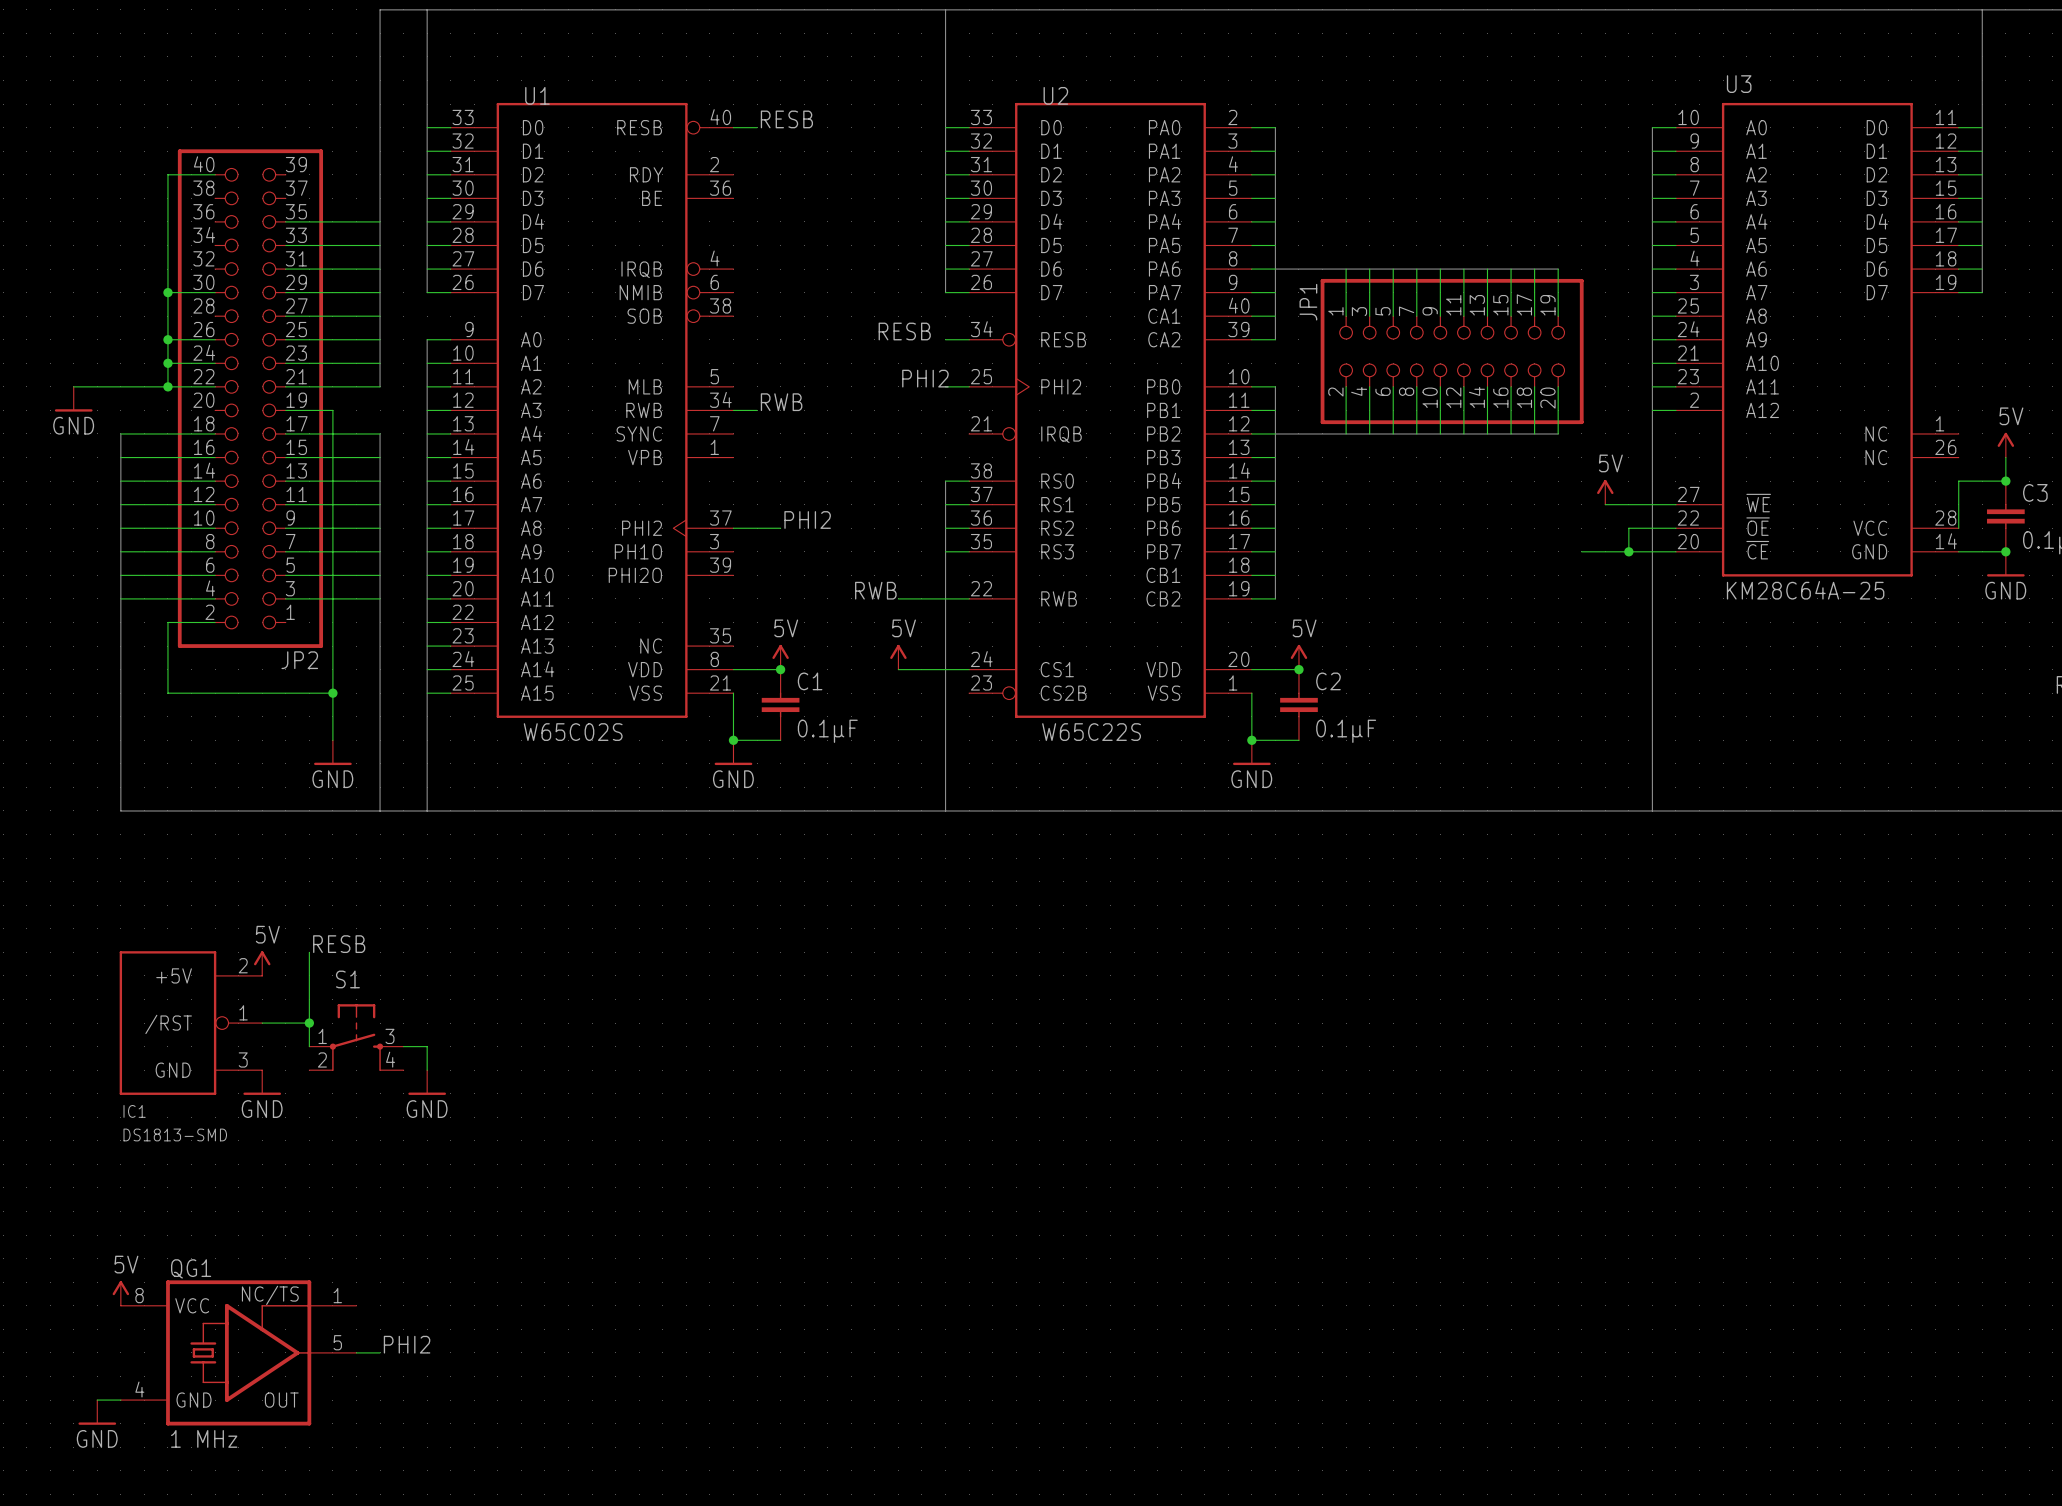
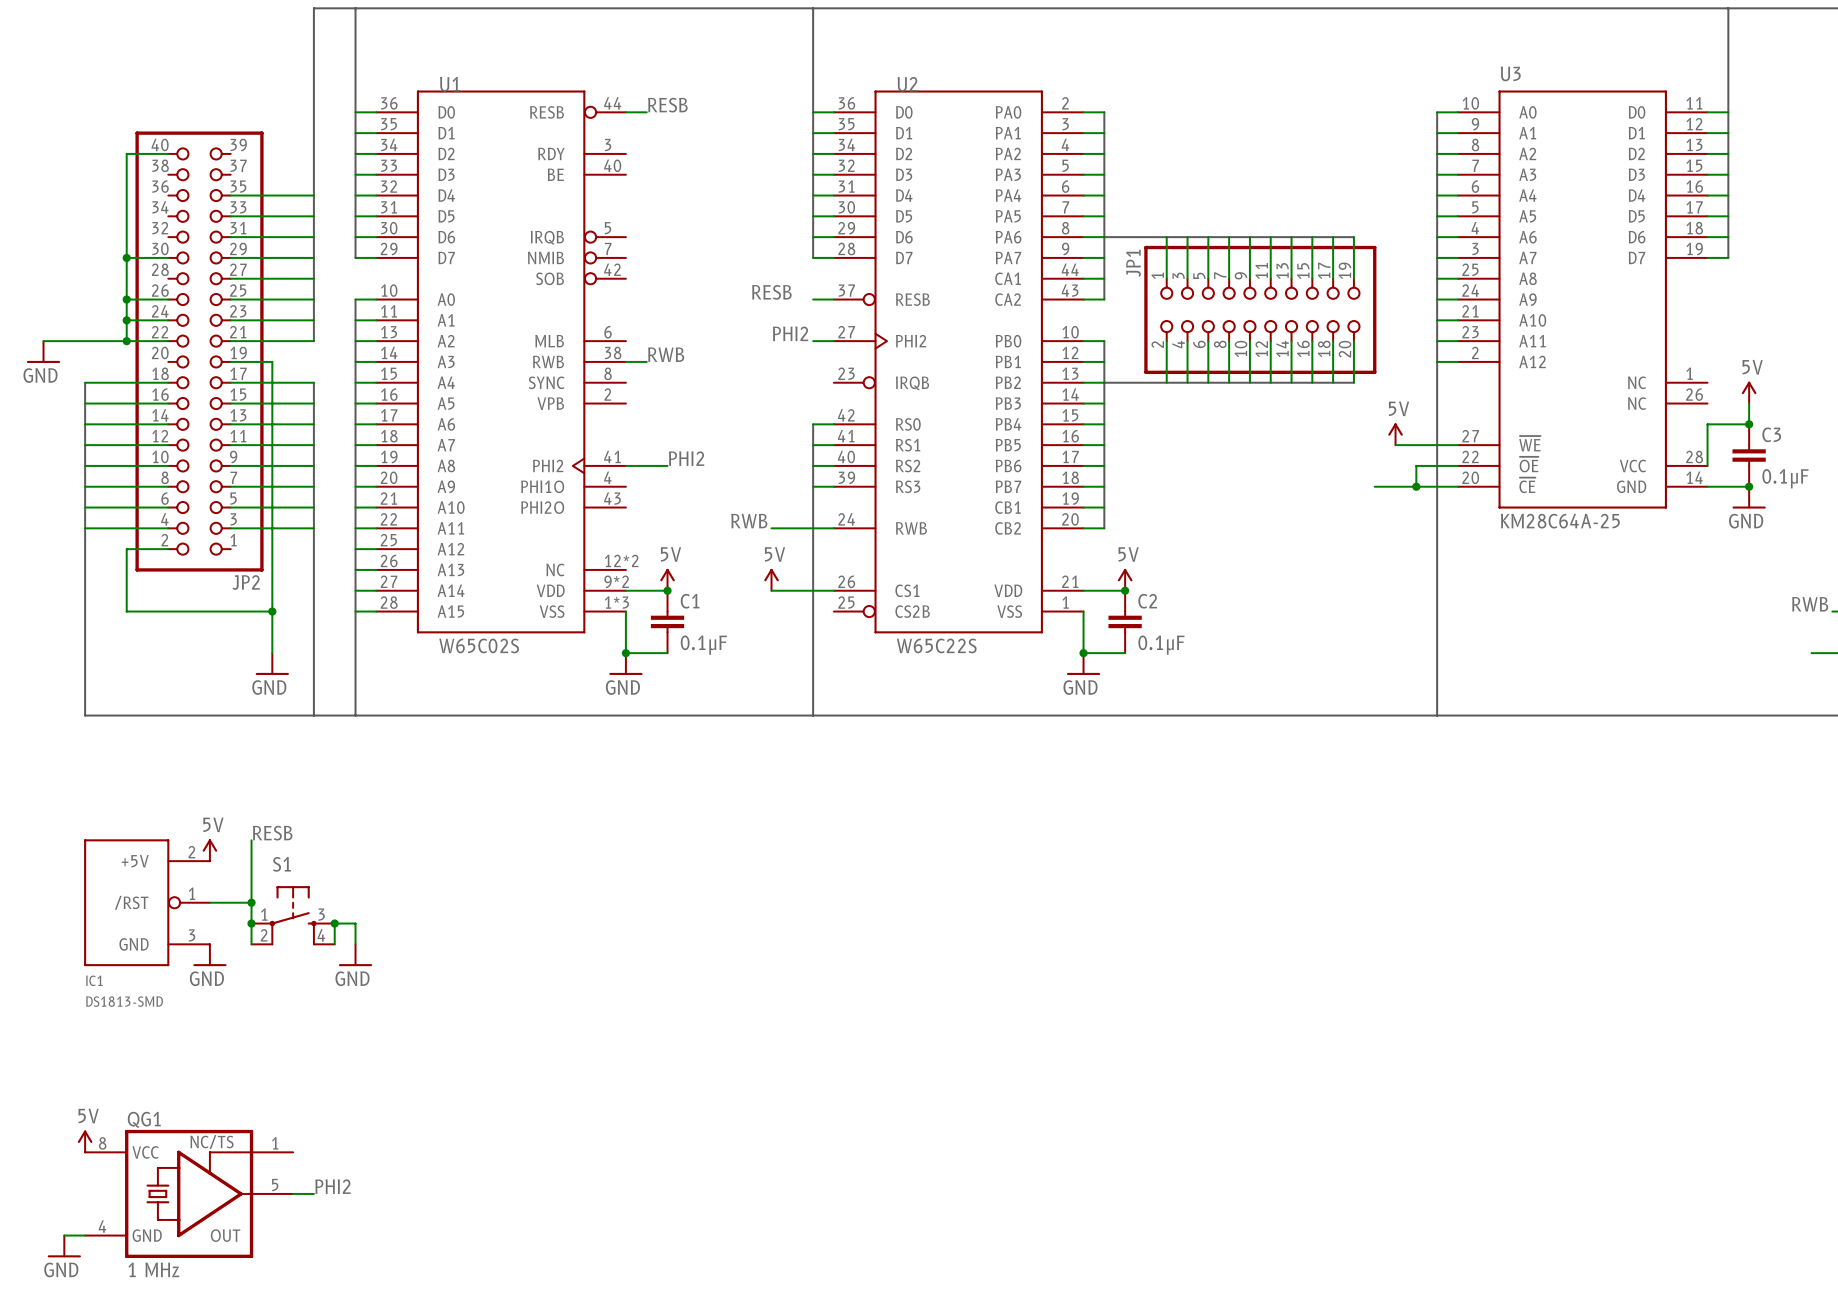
U1 symbol: [450, 102, 734, 718] -> [376, 90, 626, 634]
U2 symbol: [969, 102, 1252, 718] -> [833, 90, 1084, 634]
wire: none -> (251, 923) (251, 944)
junction: none -> (251, 923)
wire: none -> (334, 923) (334, 944)
junction: none -> (334, 923)

